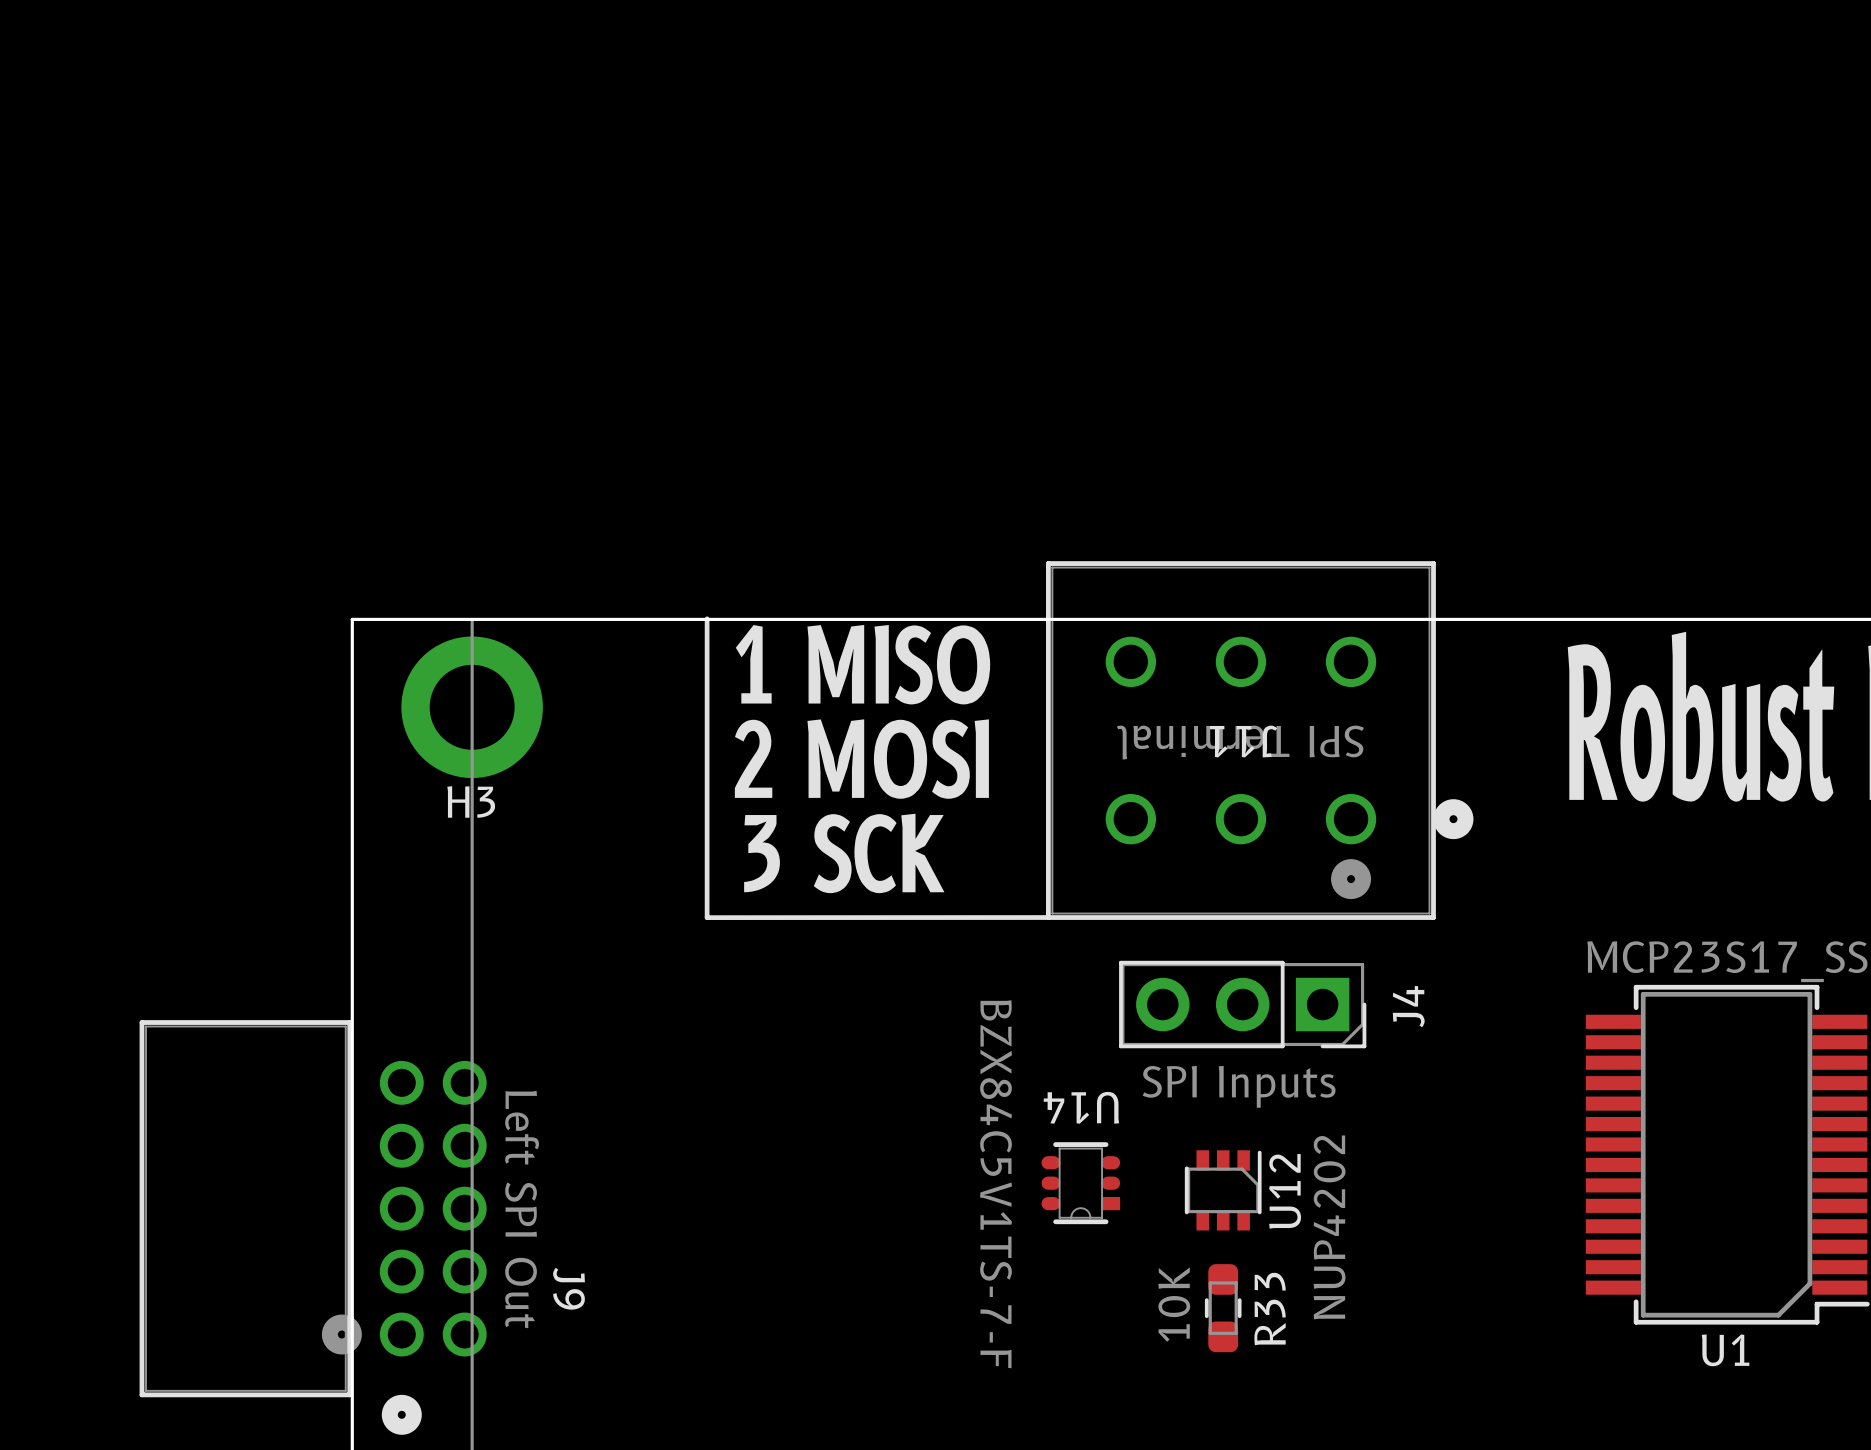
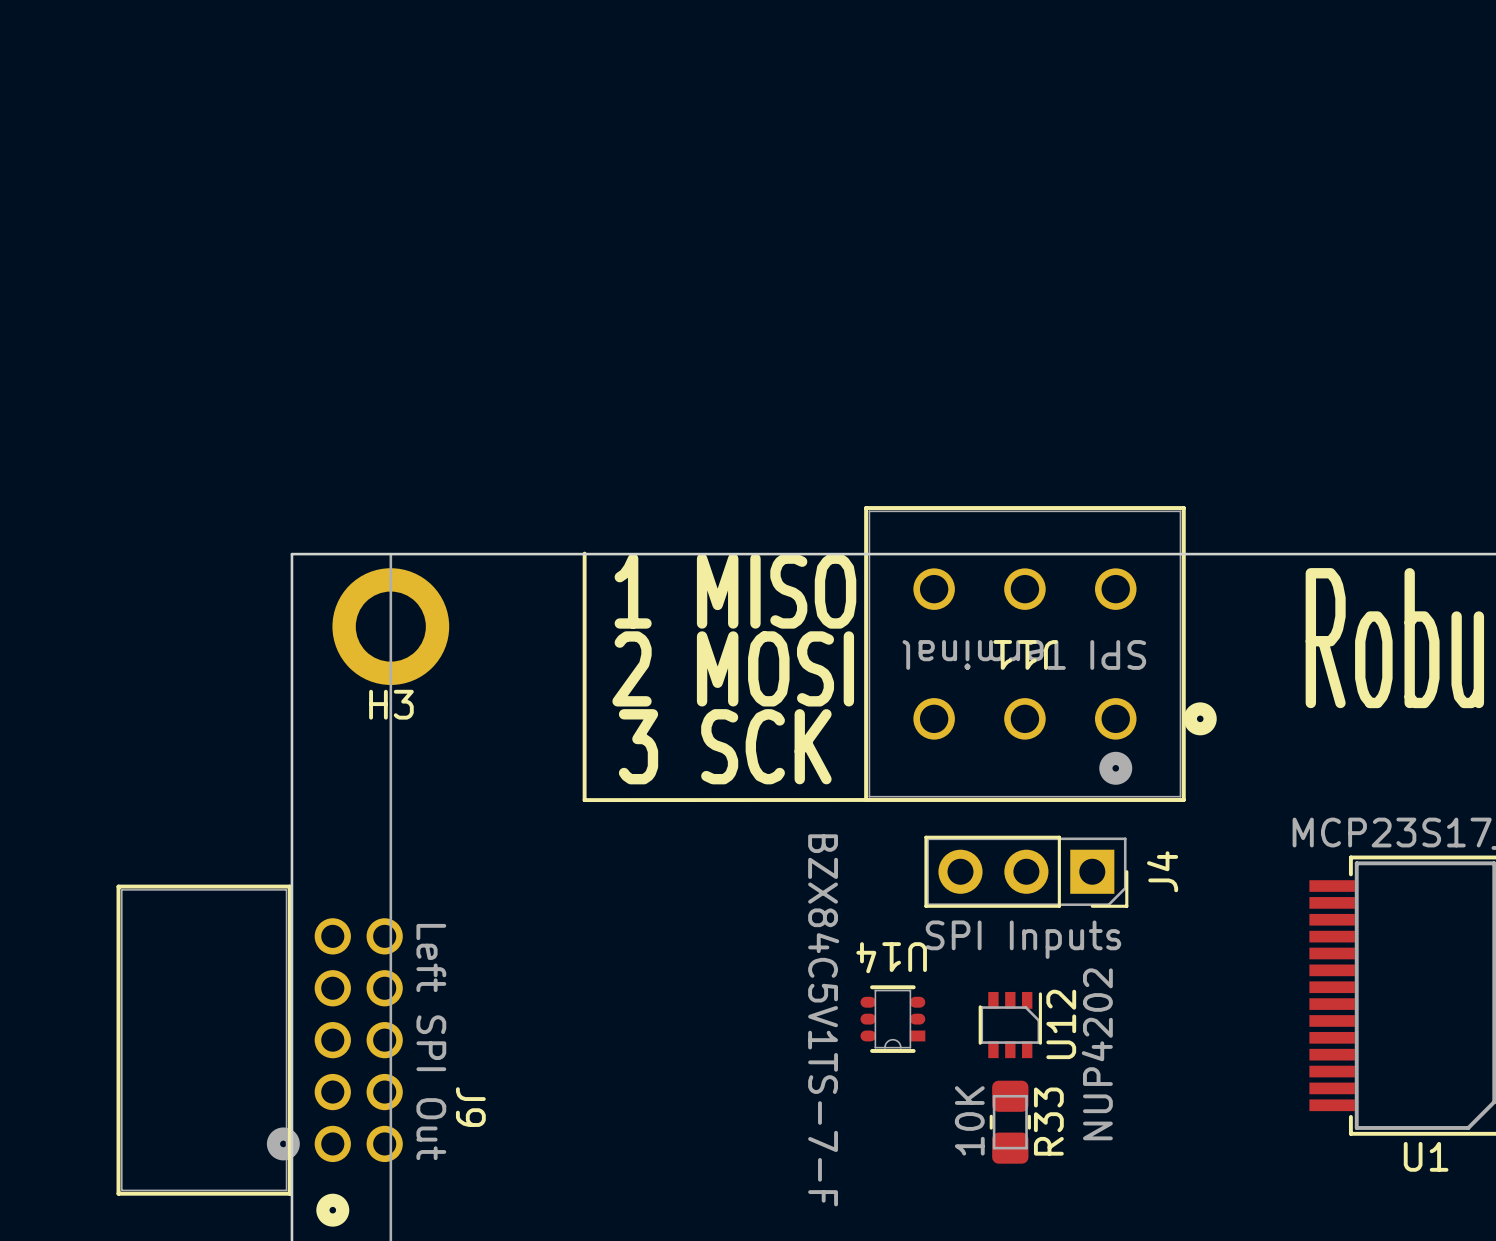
R33 footprint: [1204, 1264, 1242, 1353] -> [989, 1080, 1031, 1164]

